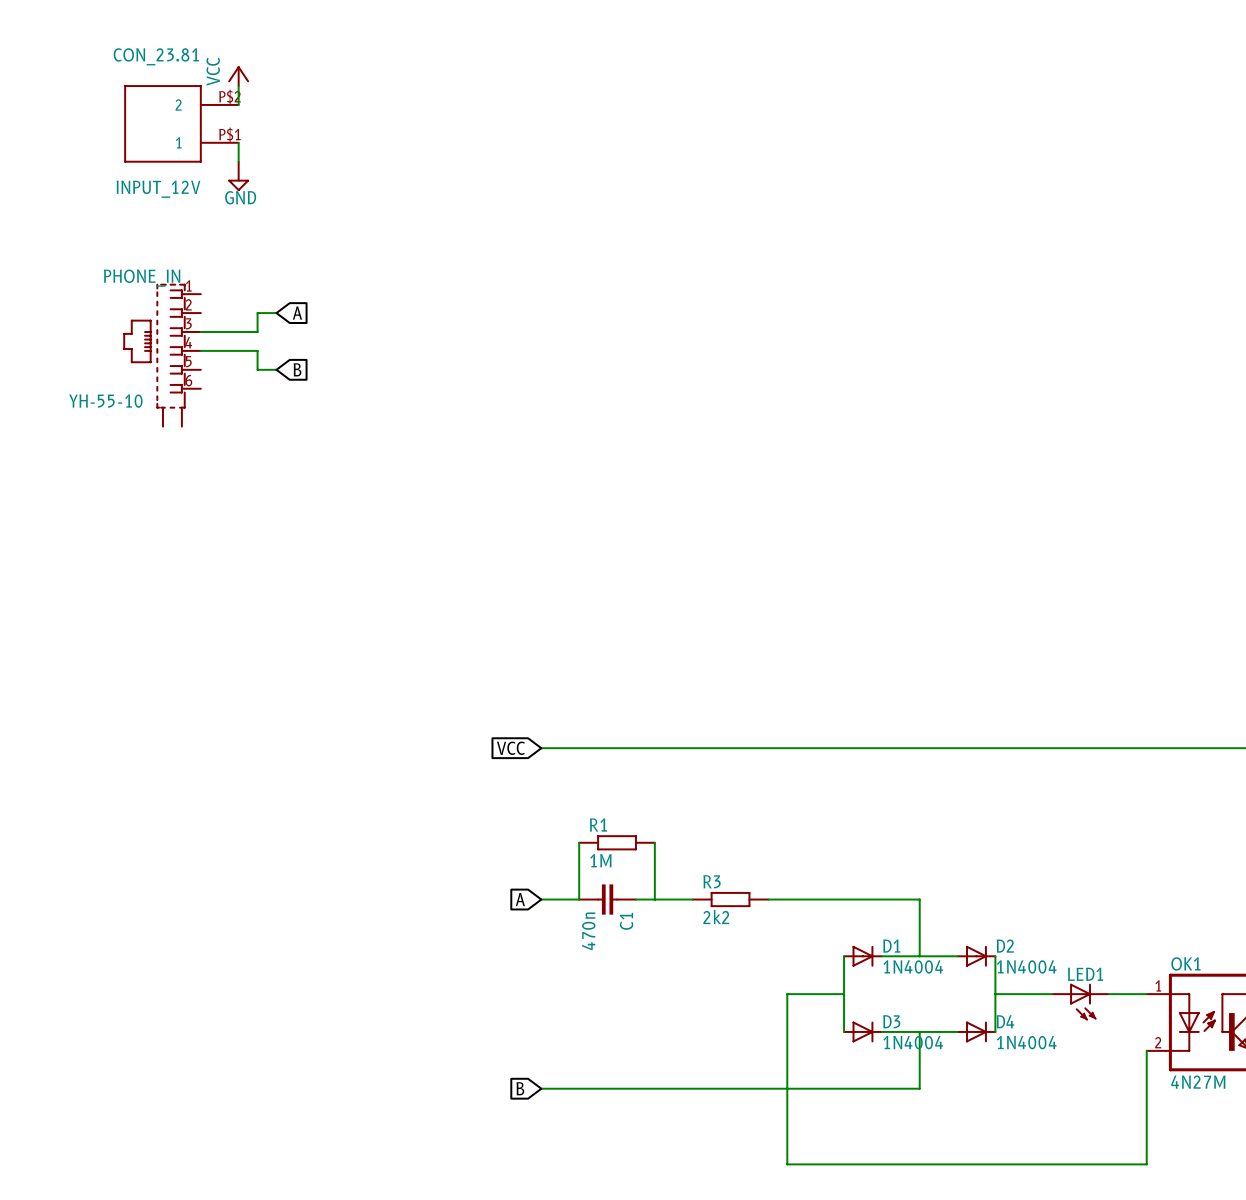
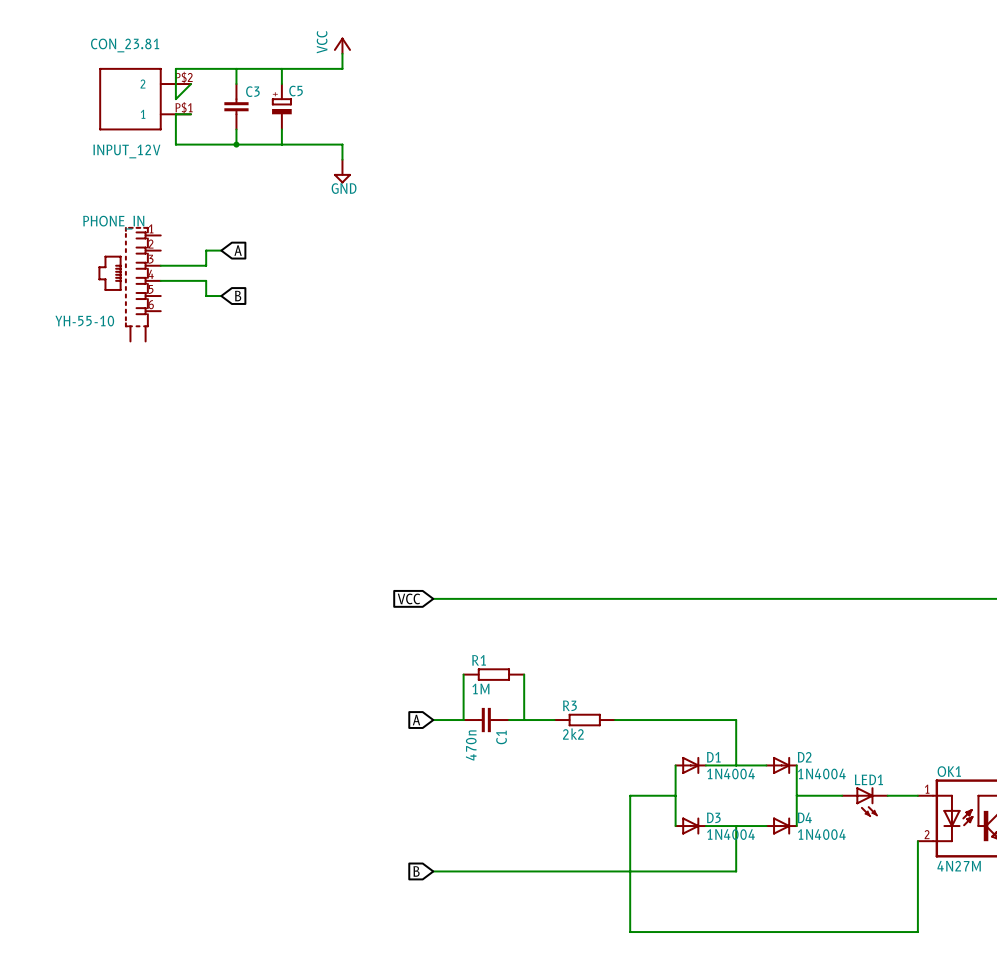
power symbol: none -> VCC (342, 45)
power symbol: VCC (238, 76) -> none
wire: (238, 86) (238, 104) -> (342, 53) (342, 68) (175, 68) (175, 99) (191, 84)
wire: none -> (236, 68) (236, 84)
wire: none -> (281, 68) (281, 84)
C3: none -> (236, 106)
C5: none -> (281, 106)
wire: (238, 142) (238, 161) -> (191, 114) (175, 114) (175, 144) (342, 144) (342, 159)
wire: none -> (236, 129) (236, 144)
wire: none -> (281, 129) (281, 144)
power symbol: GND (238, 176) -> none
junction: none -> (236, 144)
power symbol: none -> GND (342, 171)

